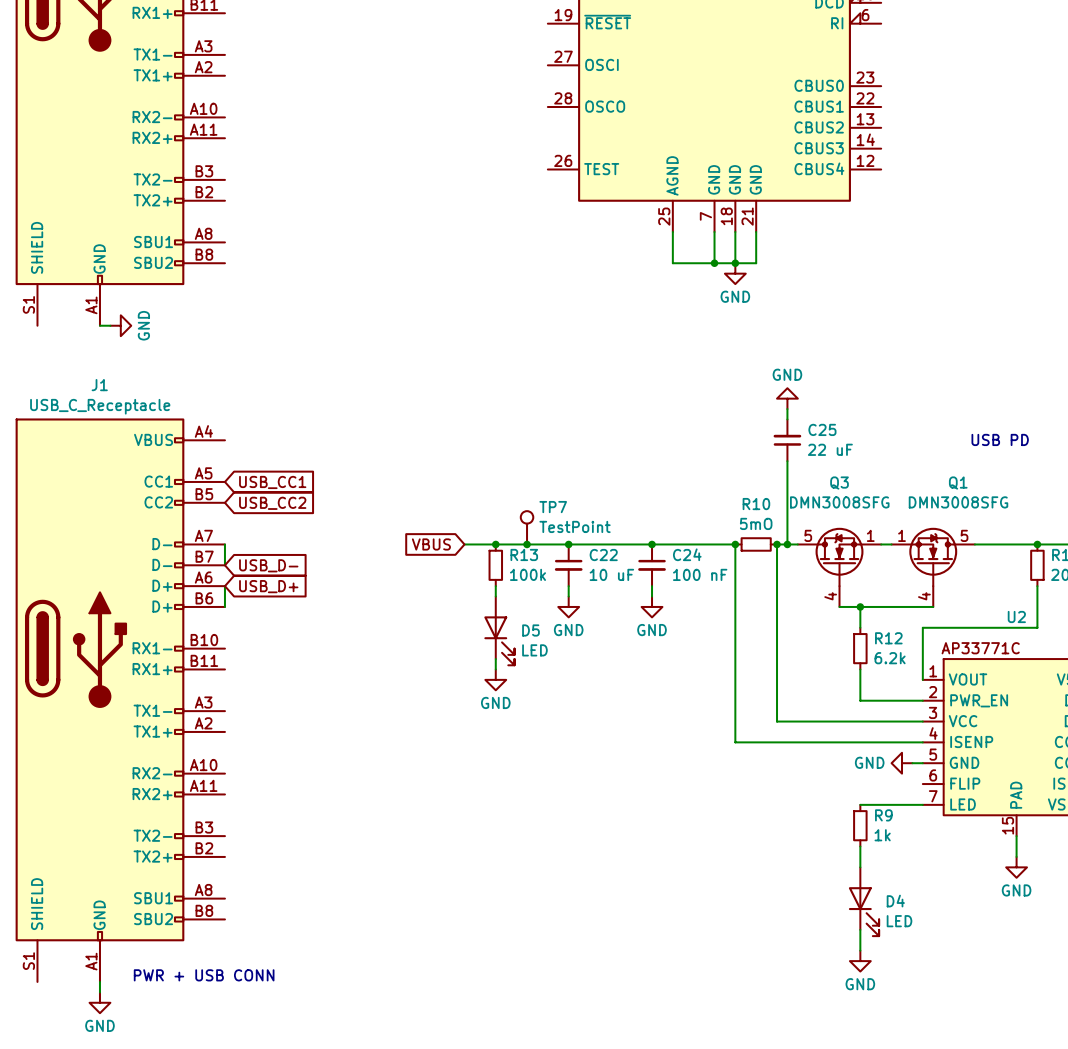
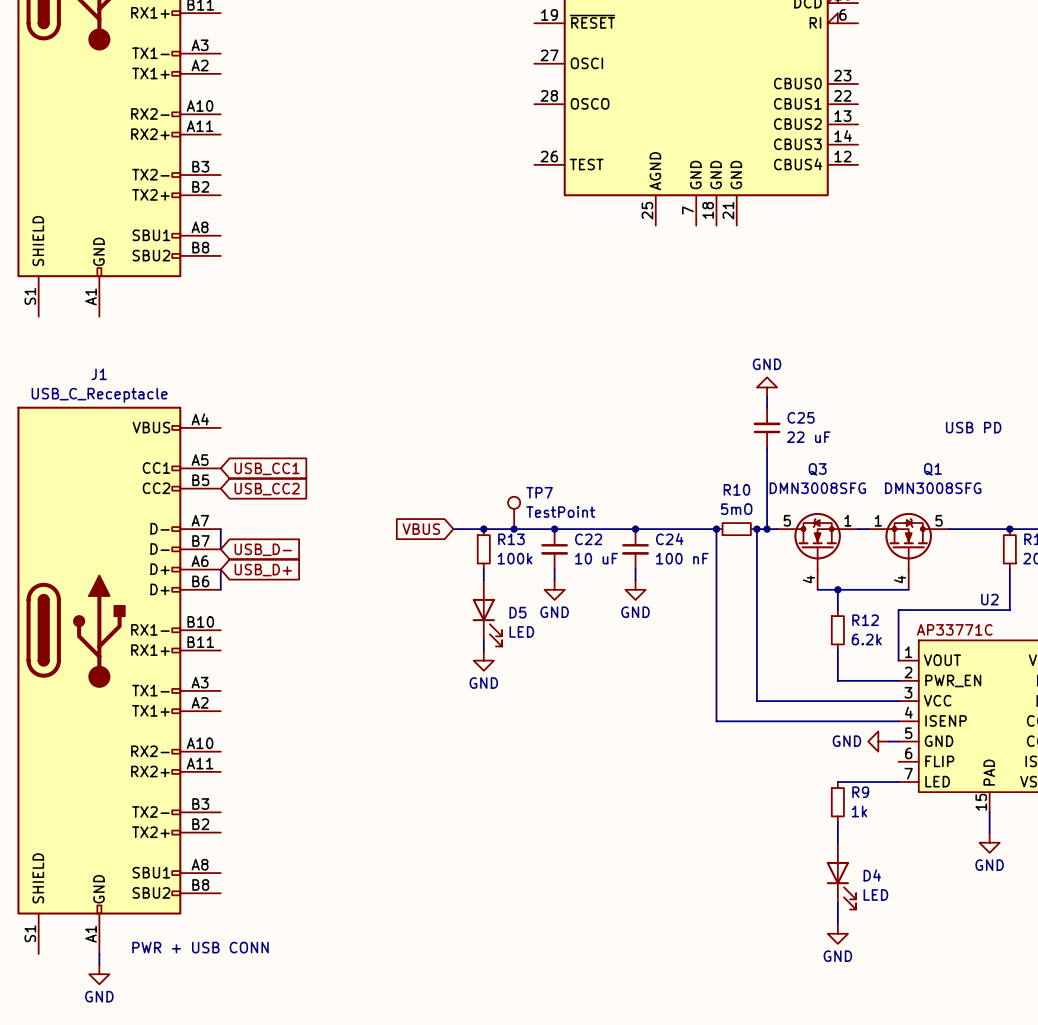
wire: (672, 231) (672, 263) (756, 263) (756, 231) -> none
wire: (714, 231) (714, 263) -> none
wire: (735, 231) (735, 263) -> none
junction: (714, 263) -> none
junction: (735, 263) -> none
power symbol: GND (735, 273) -> none
wire: (99, 325) (110, 325) -> none
power symbol: GND (120, 325) -> none

